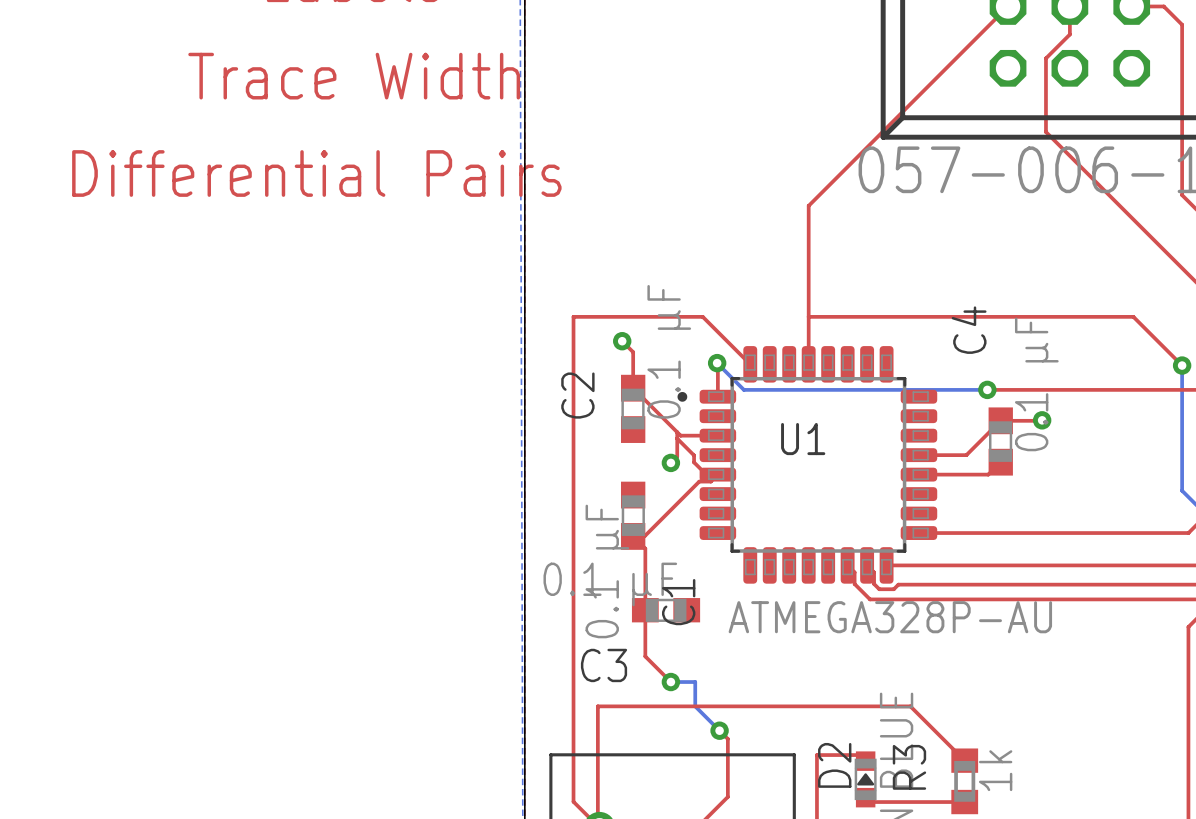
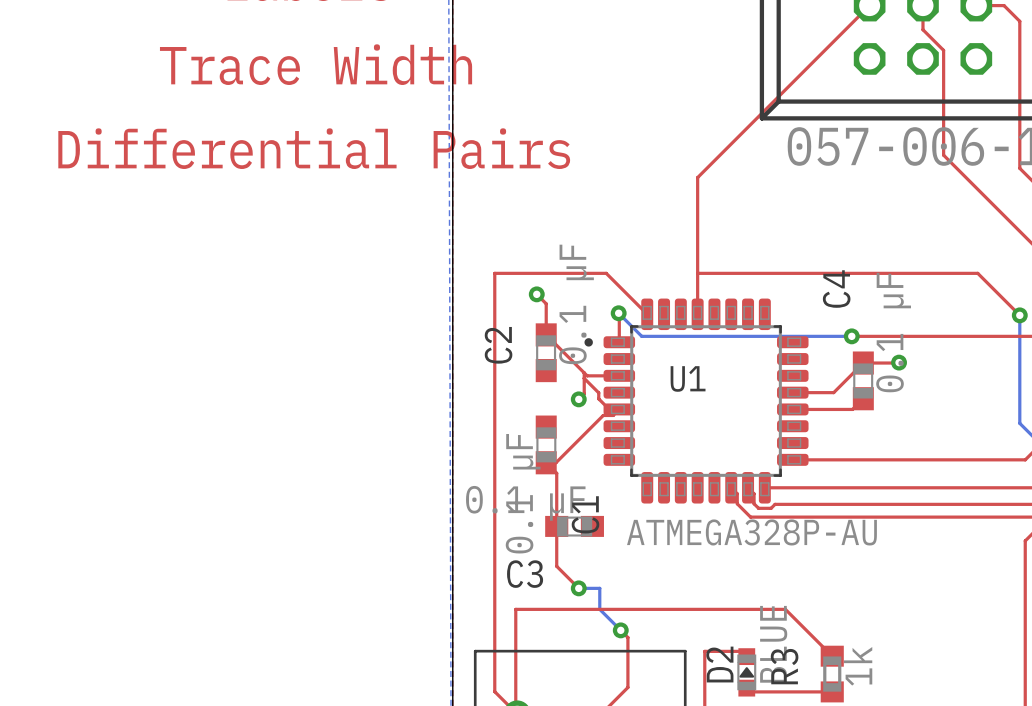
top track: (1069, 34) (1045, 58) (1045, 132) (1093, 179) -> (922, 29) (943, 50) (943, 155)

